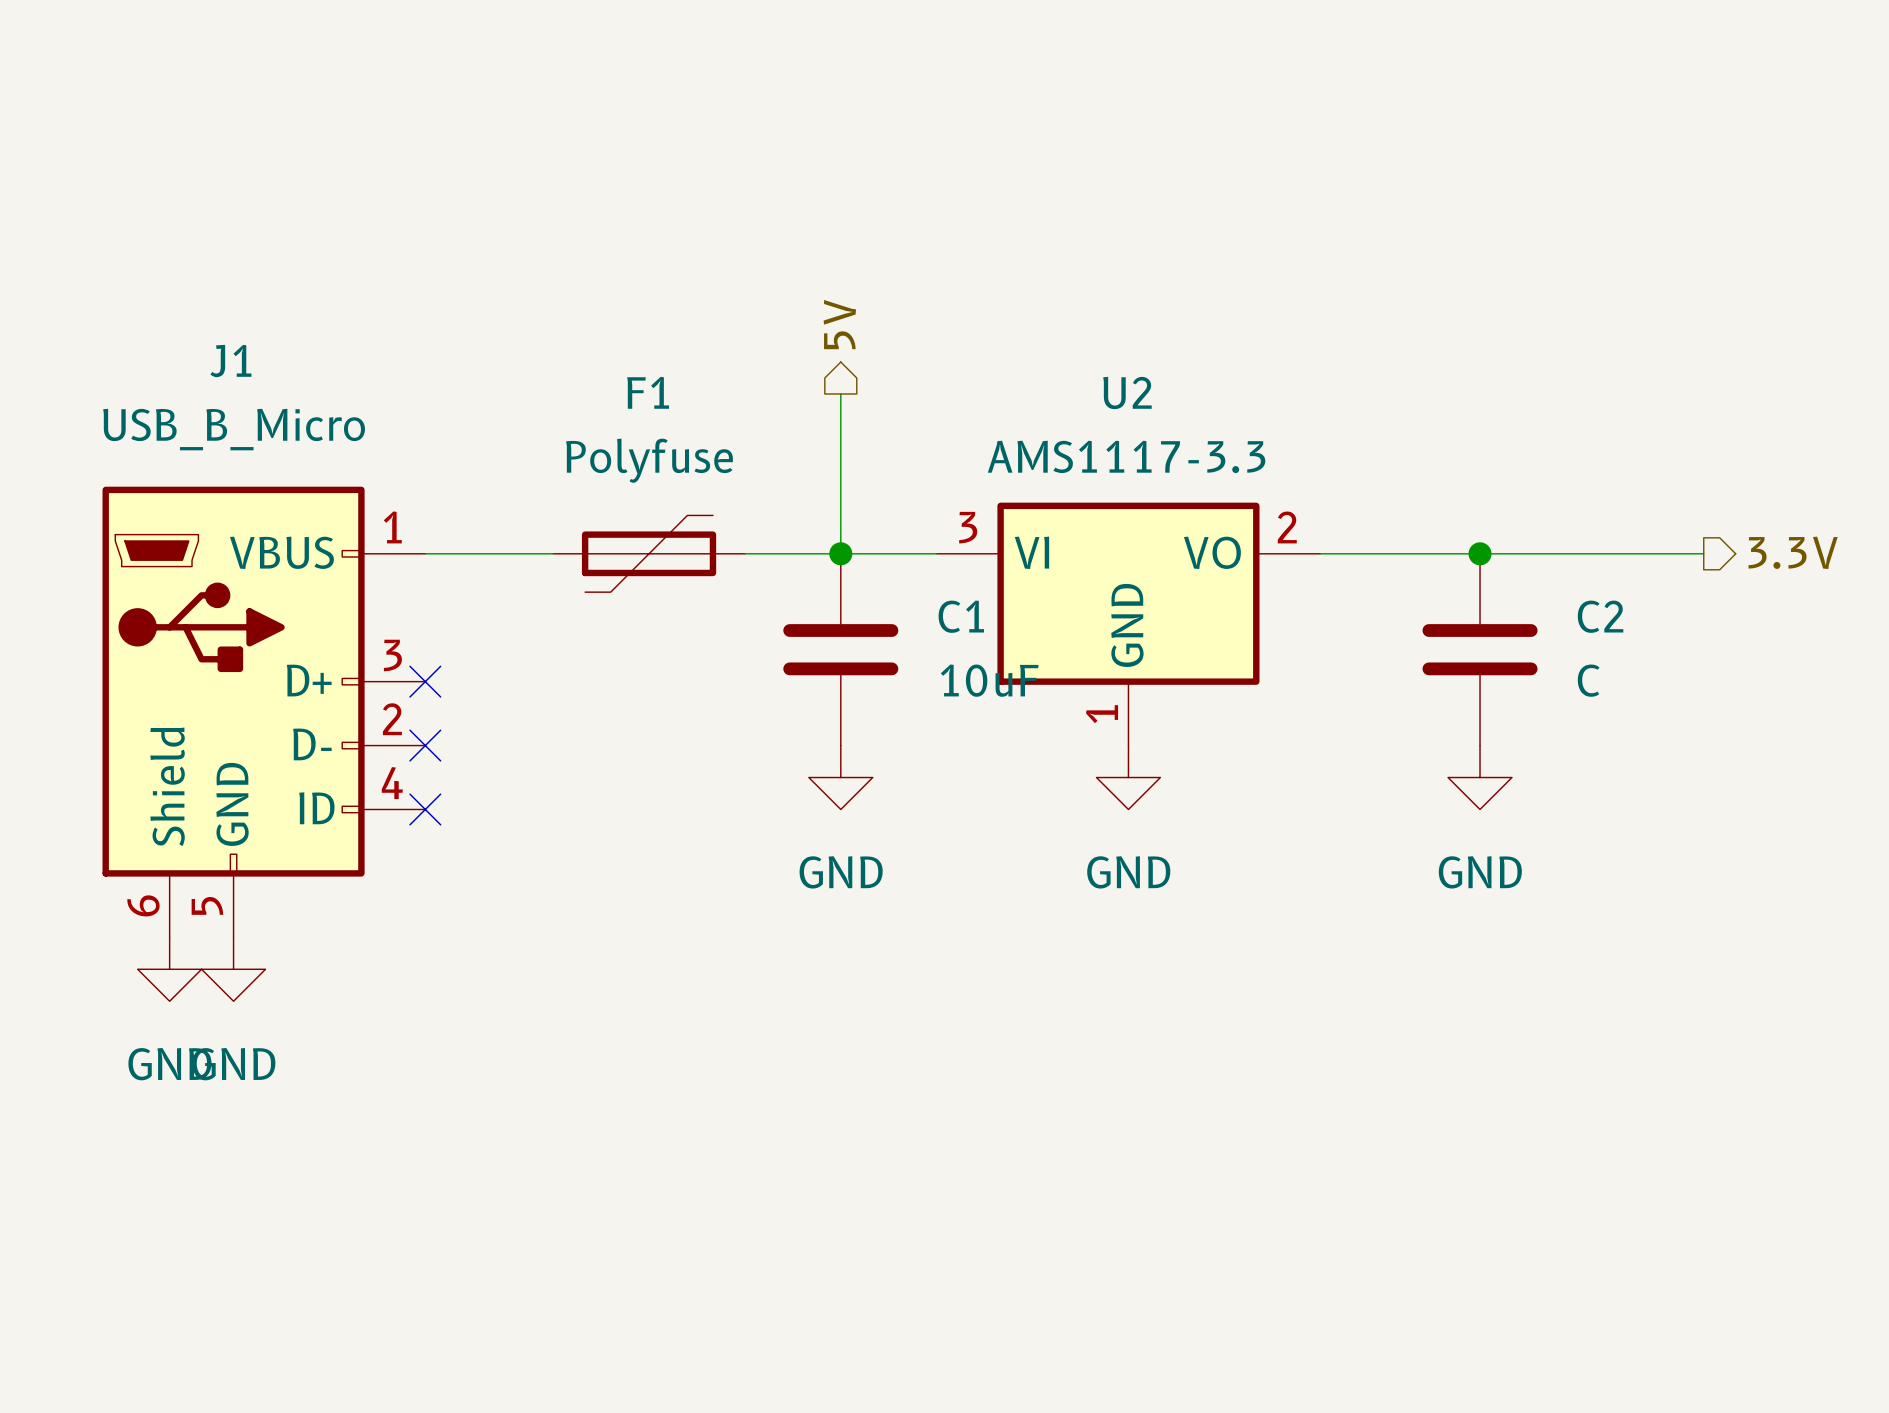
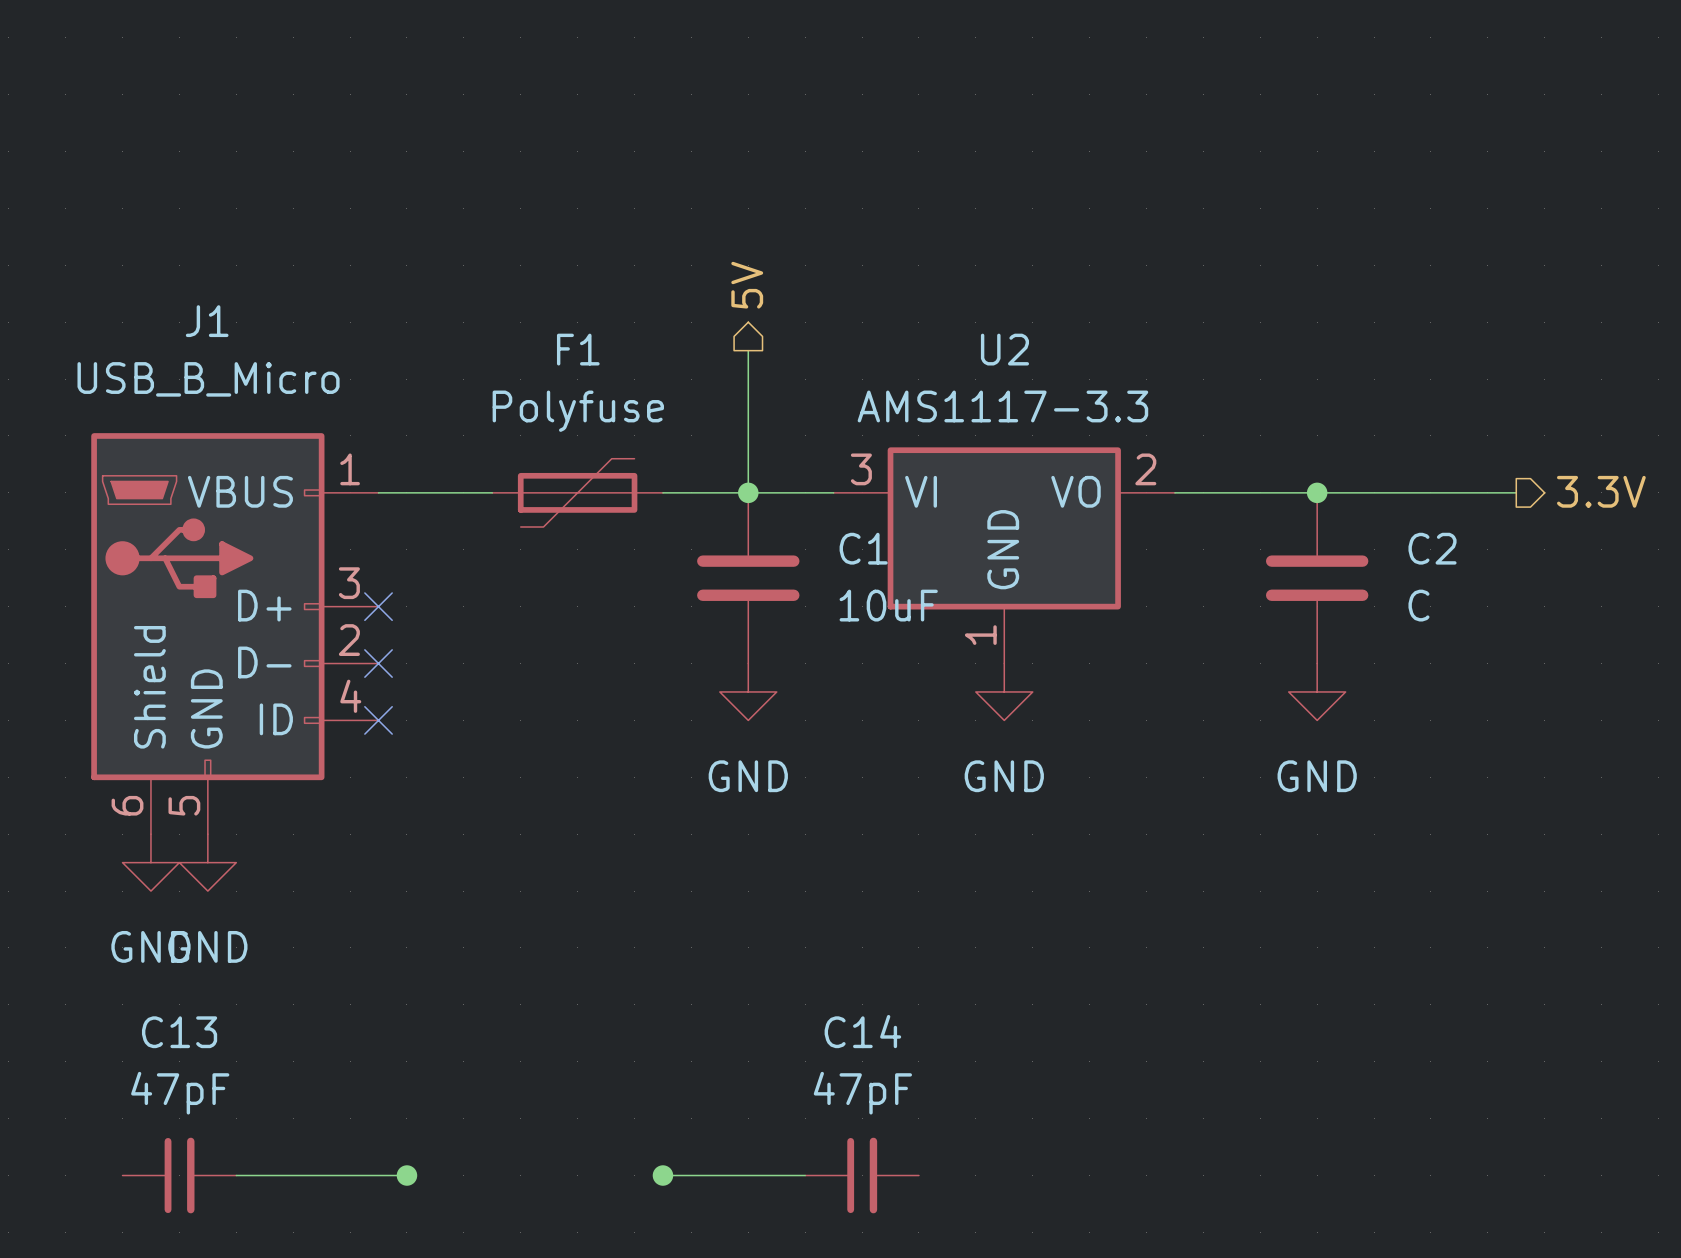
C13: none -> 47pF (179, 1175)
wire: none -> (236, 1175) (406, 1175)
junction: none -> (406, 1175)
wire: none -> (662, 1175) (805, 1175)
junction: none -> (662, 1175)
C14: none -> 47pF (862, 1175)

